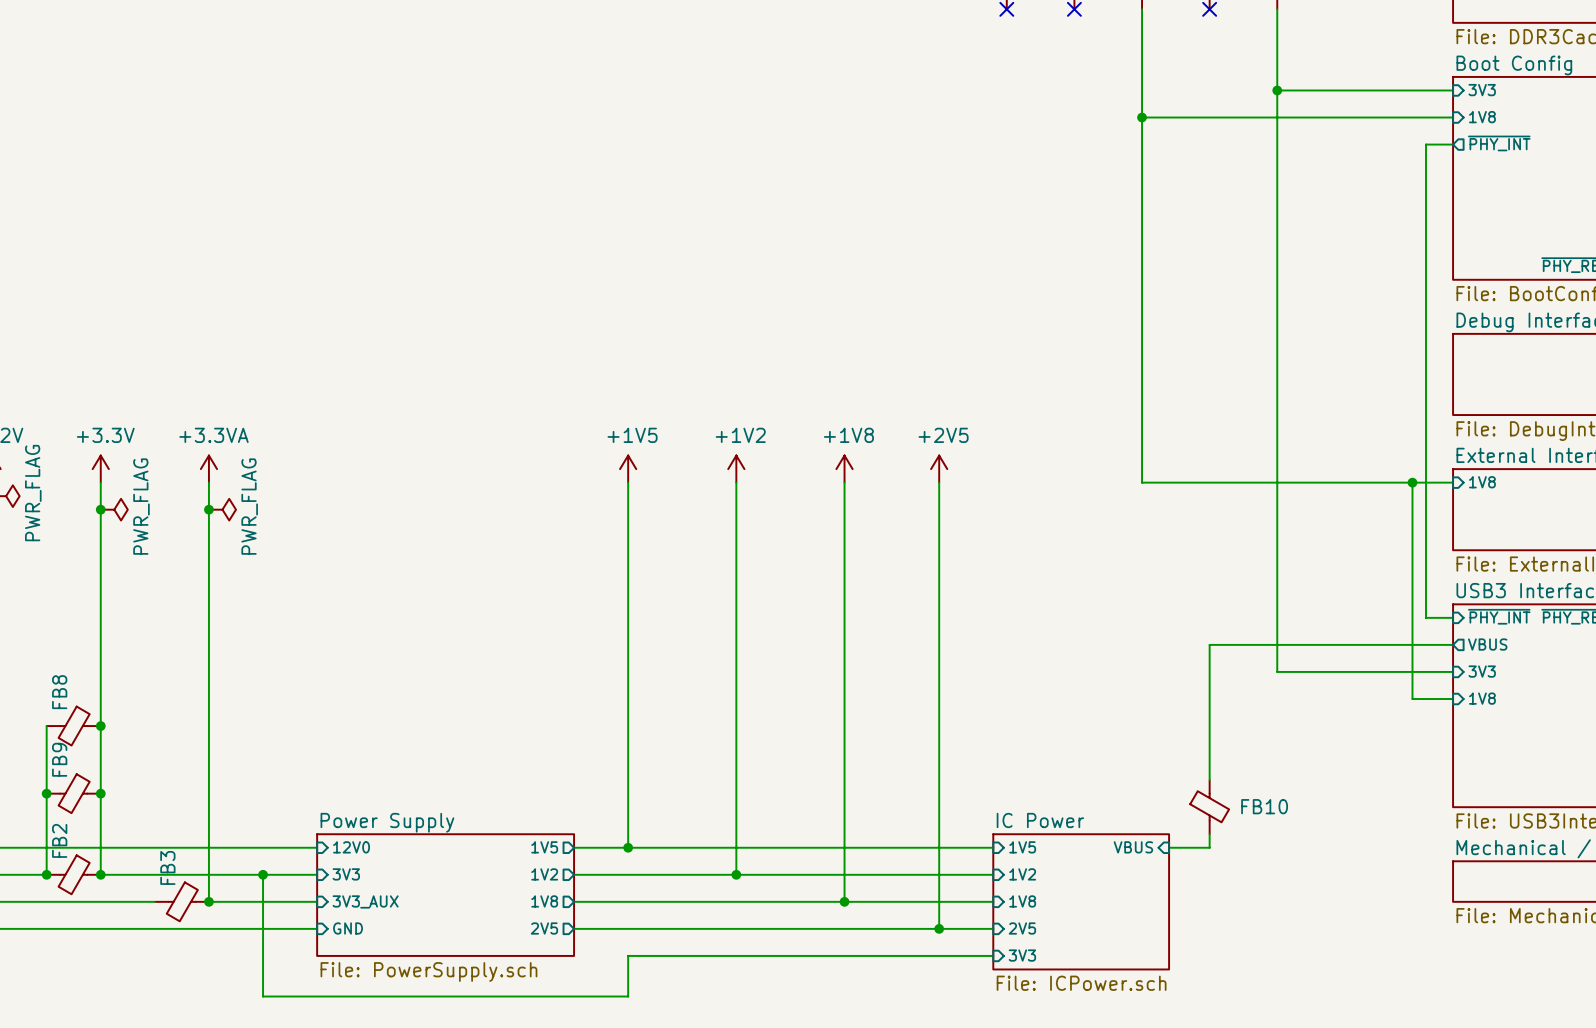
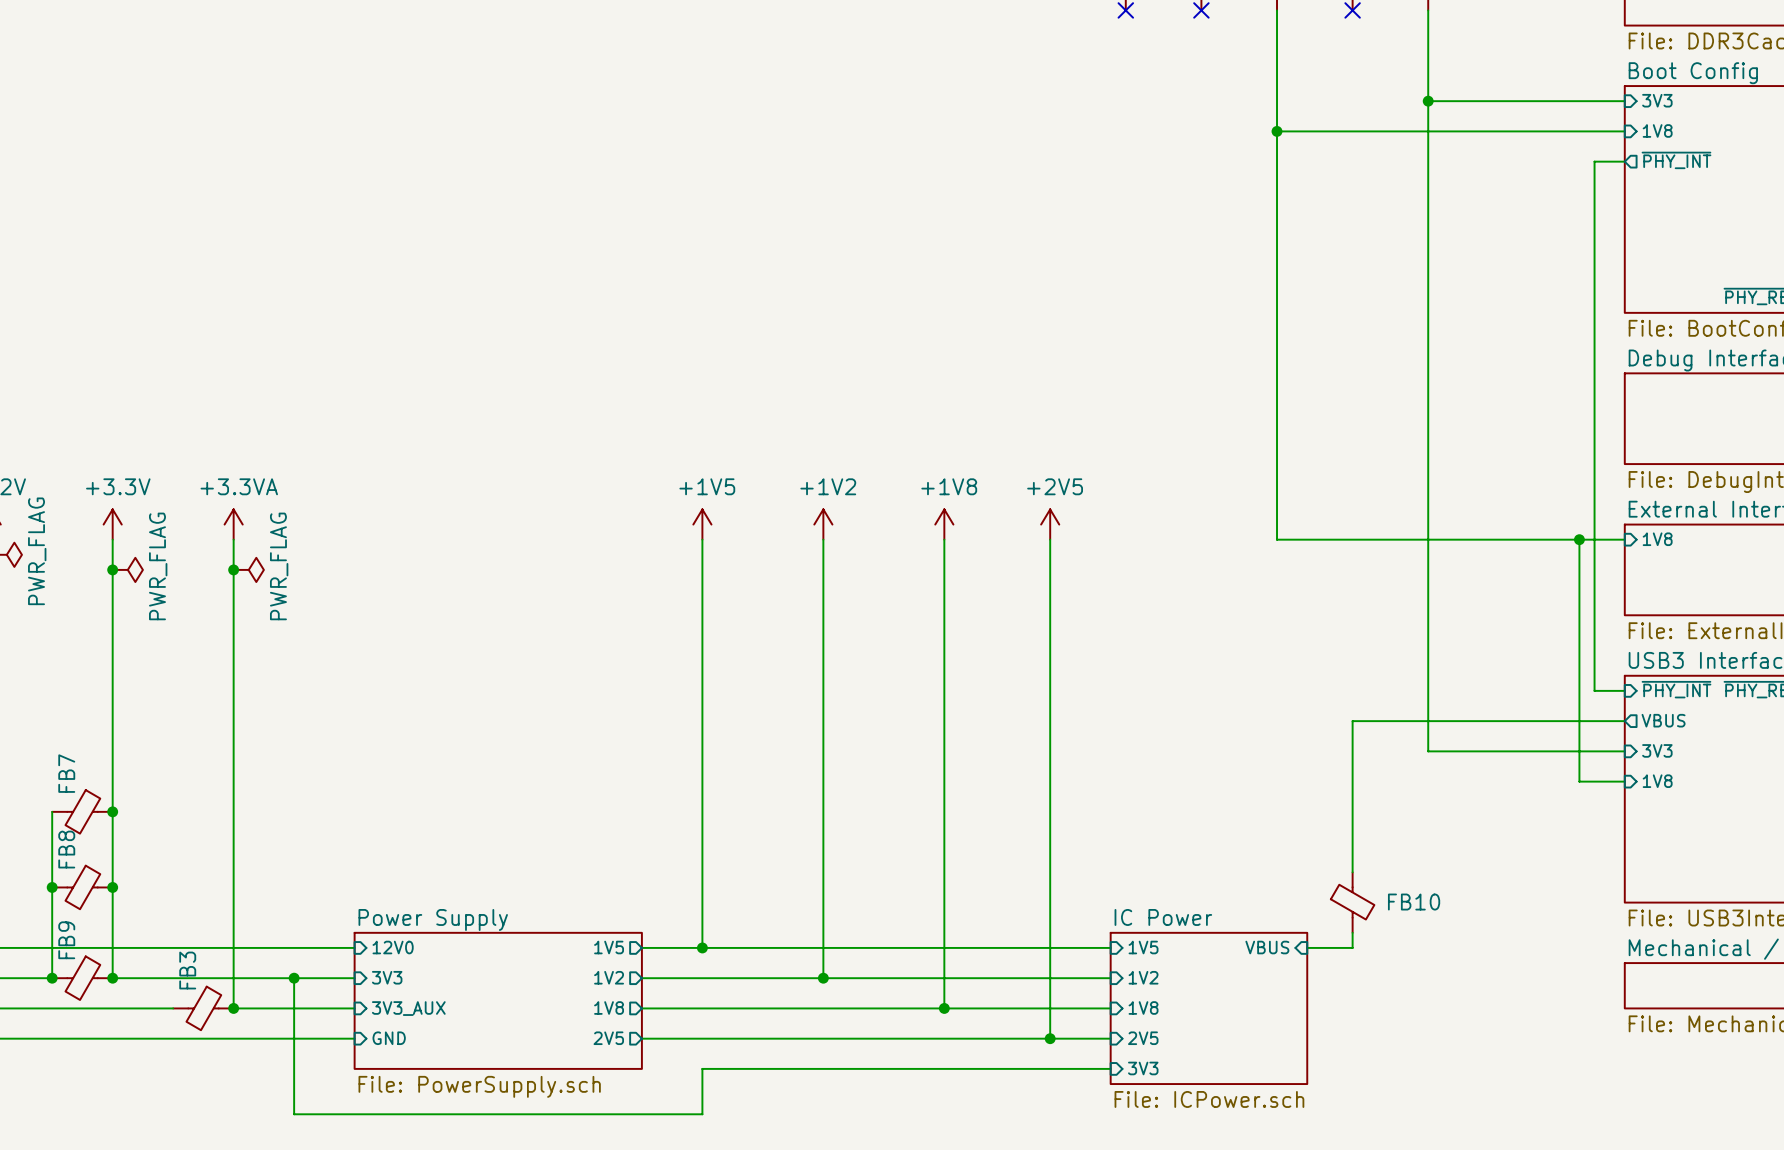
FB8 name: FB8 (59, 692) -> FB7 (66, 773)
FB9 name: FB9 (59, 759) -> FB8 (66, 849)
FB2 name: FB2 (59, 840) -> FB9 (66, 940)

